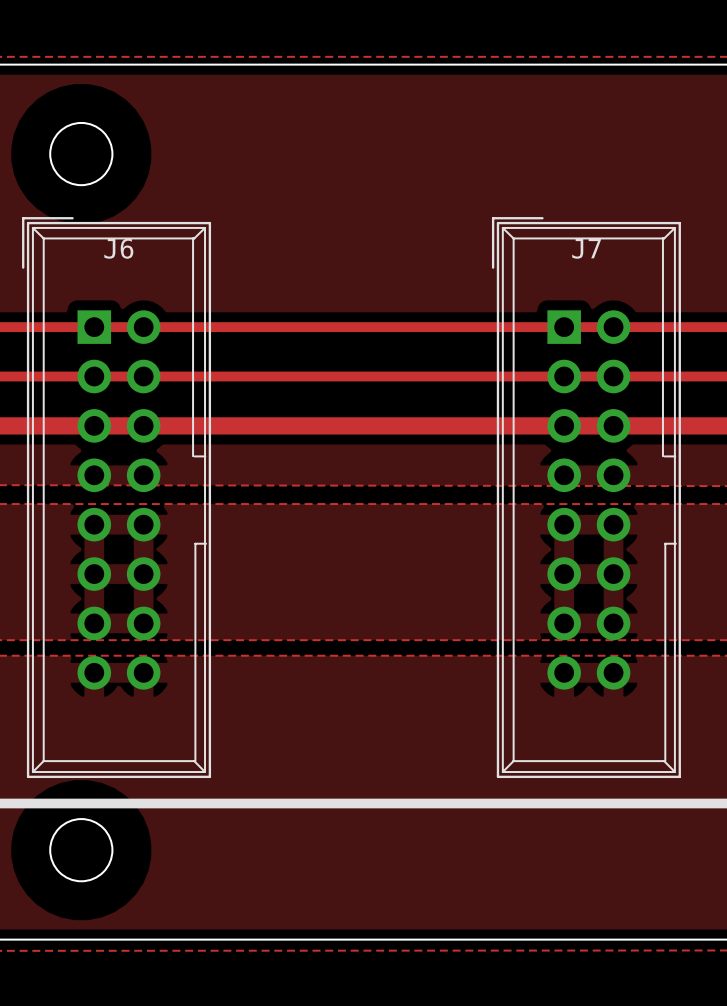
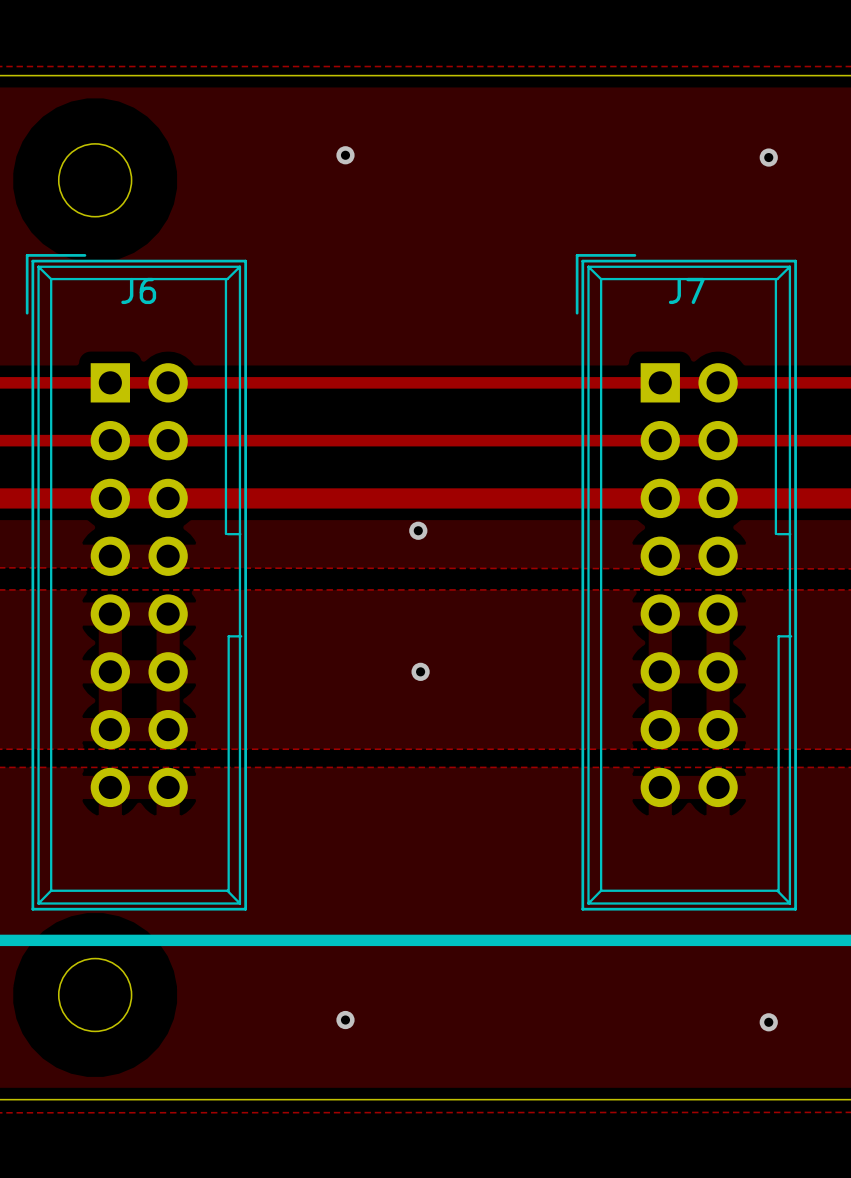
via: none -> (345, 155)
via: none -> (768, 157)
via: none -> (418, 530)
via: none -> (420, 671)
via: none -> (345, 1020)
via: none -> (768, 1022)

